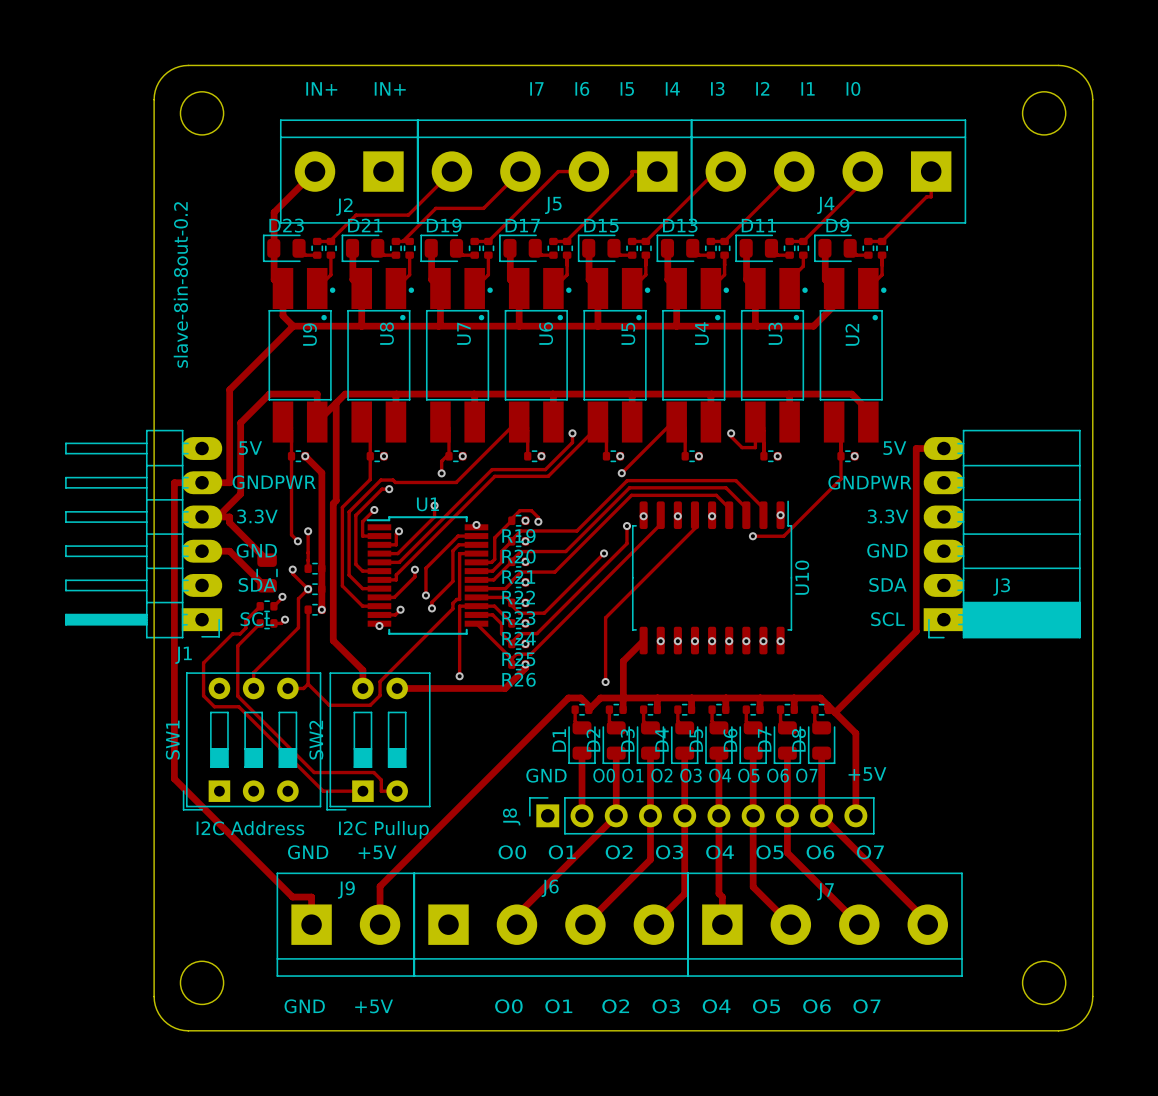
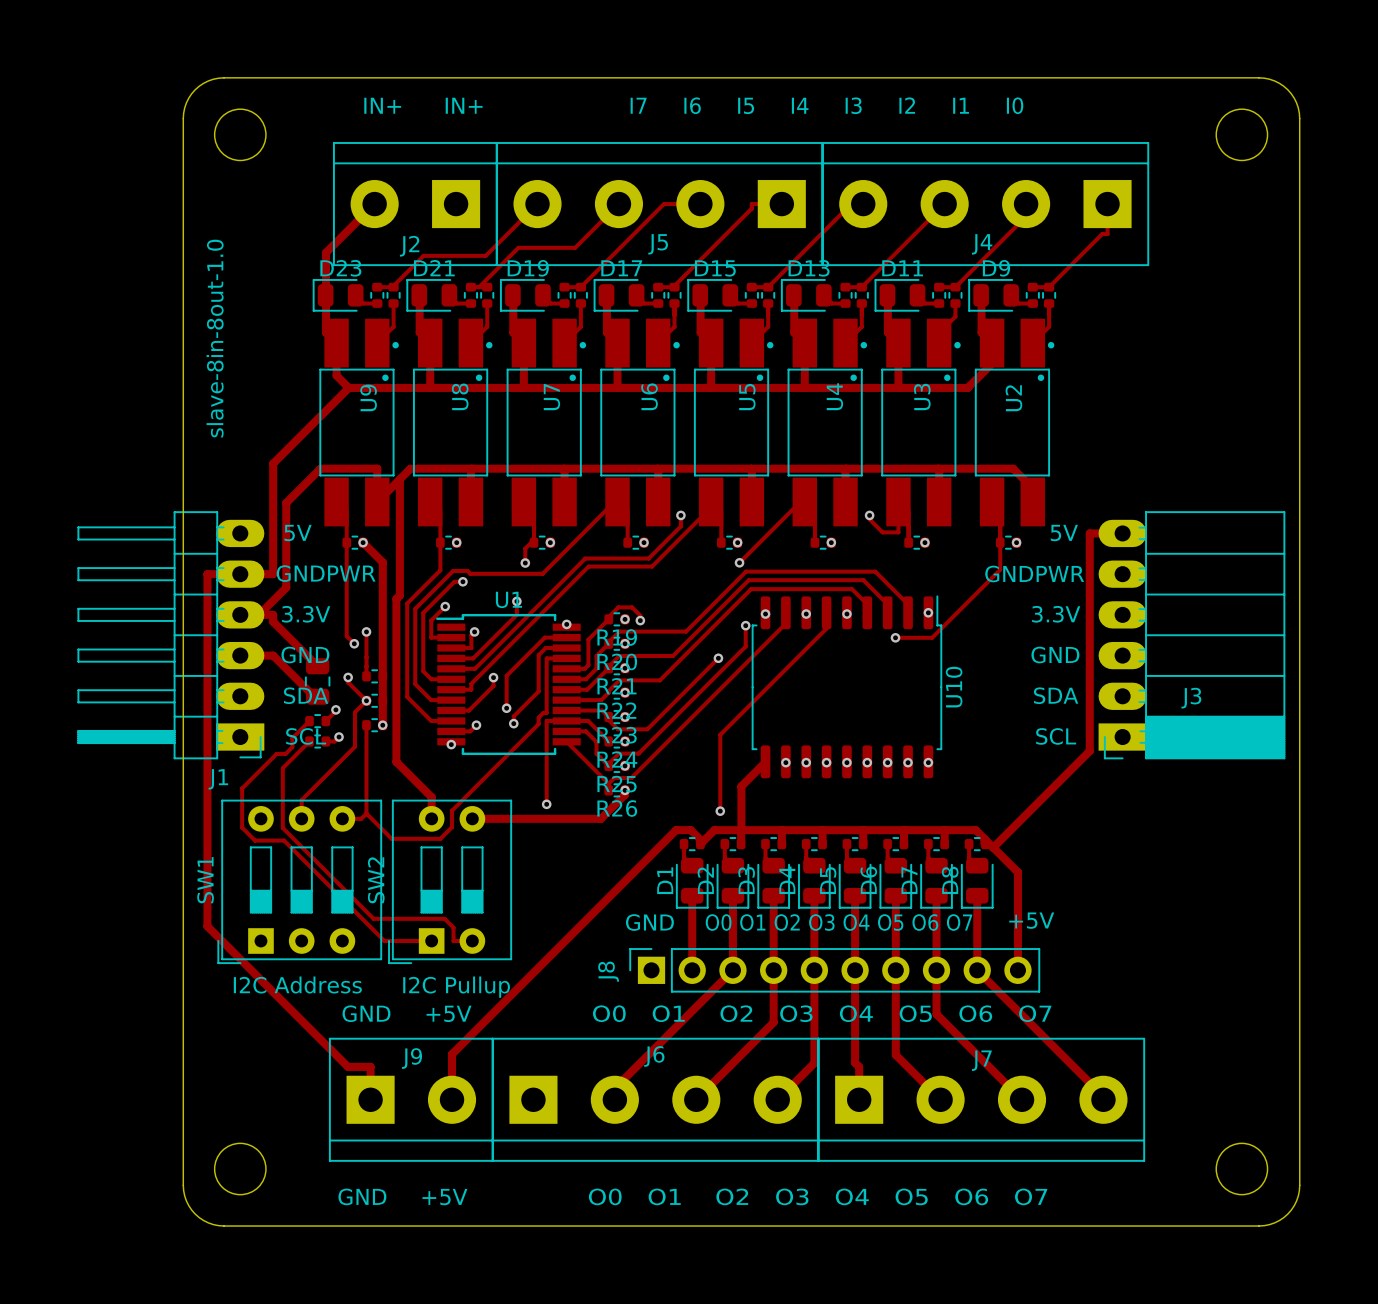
text: slave-8in-8out-0.2 (180, 284) -> slave-8in-8out-1.0 (215, 338)

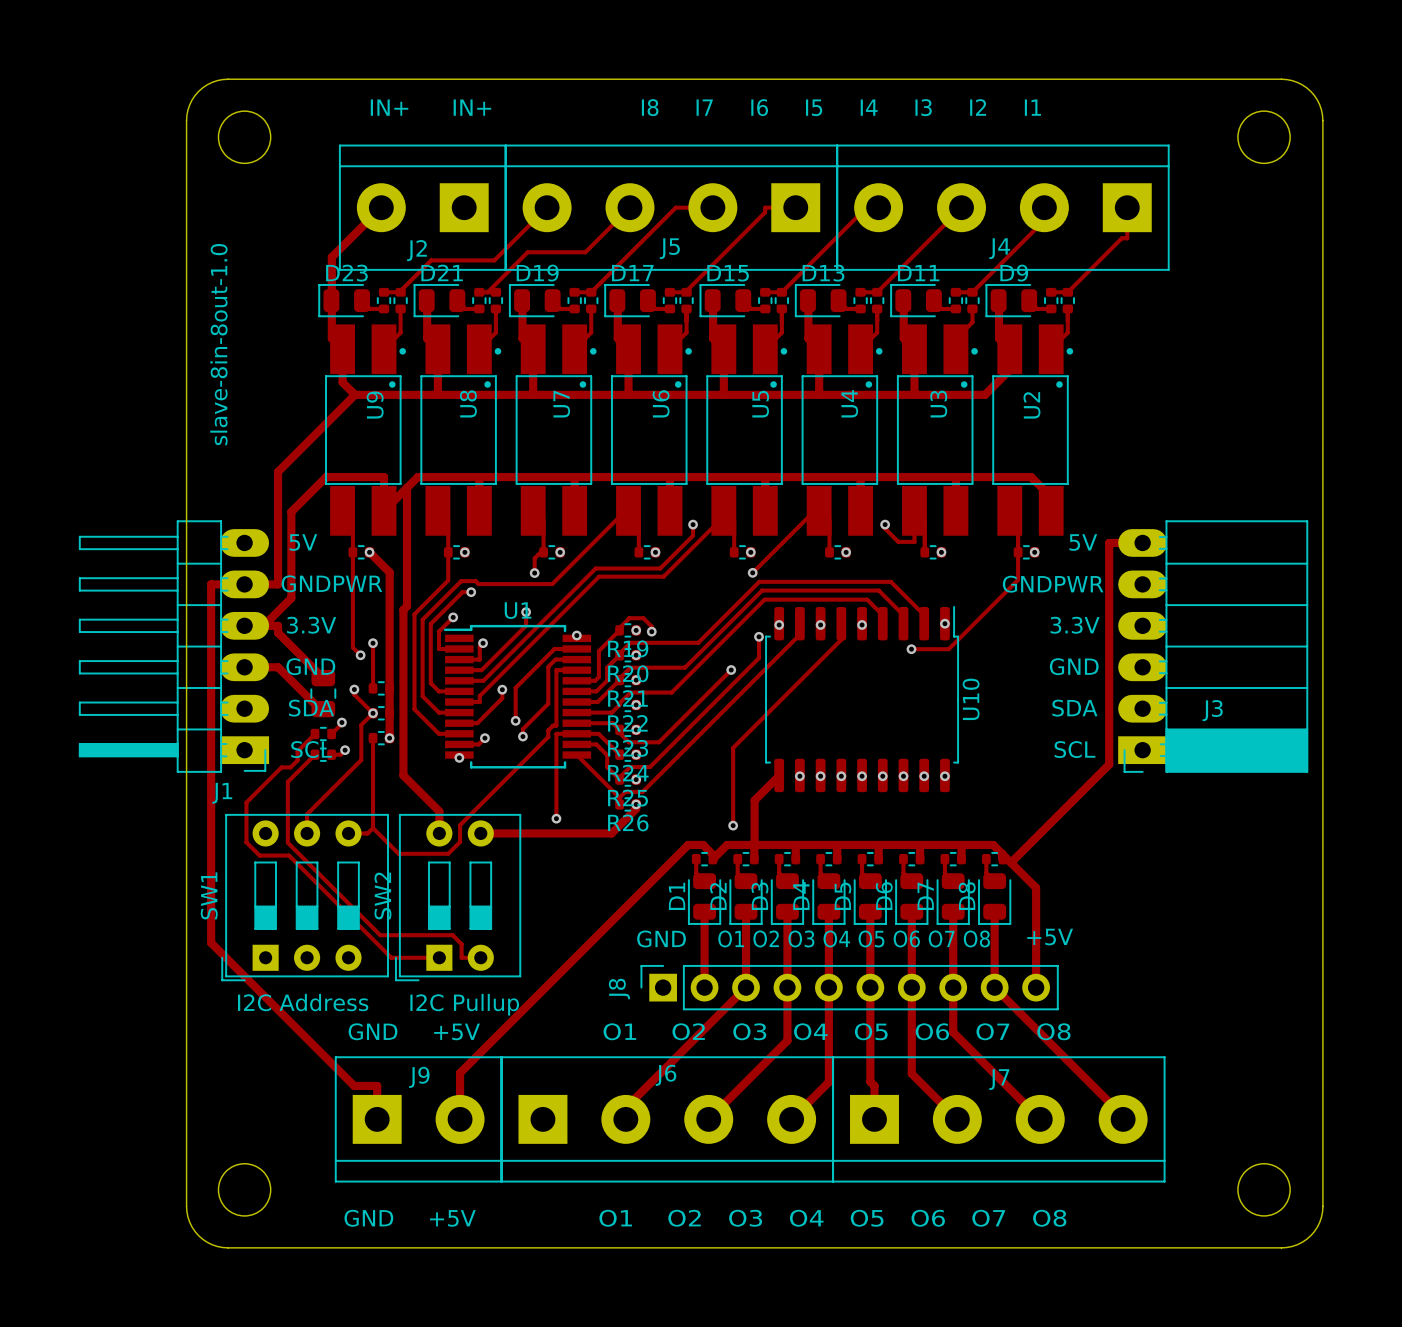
text: I7 I6 I5 I4 I3 I2 I1 I0 (826, 105) -> I8 I7 I6 I5 I4 I3 I2 I1 (841, 107)
text: O0 O1 O2 O3 O4 O5 O6 O7 (839, 922) -> O1 O2 O3 O4 O5 O6 O7 O8 (854, 938)
text: O0 O1 O2 O3 O4 O5 O6 O7 (822, 1013) -> O1 O2 O3 O4 O5 O6 O7 O8 (837, 1031)
text: O0 O1 O2 O3 O4 O5 O6 O7 (818, 1196) -> O1 O2 O3 O4 O5 O6 O7 O8 (832, 1218)

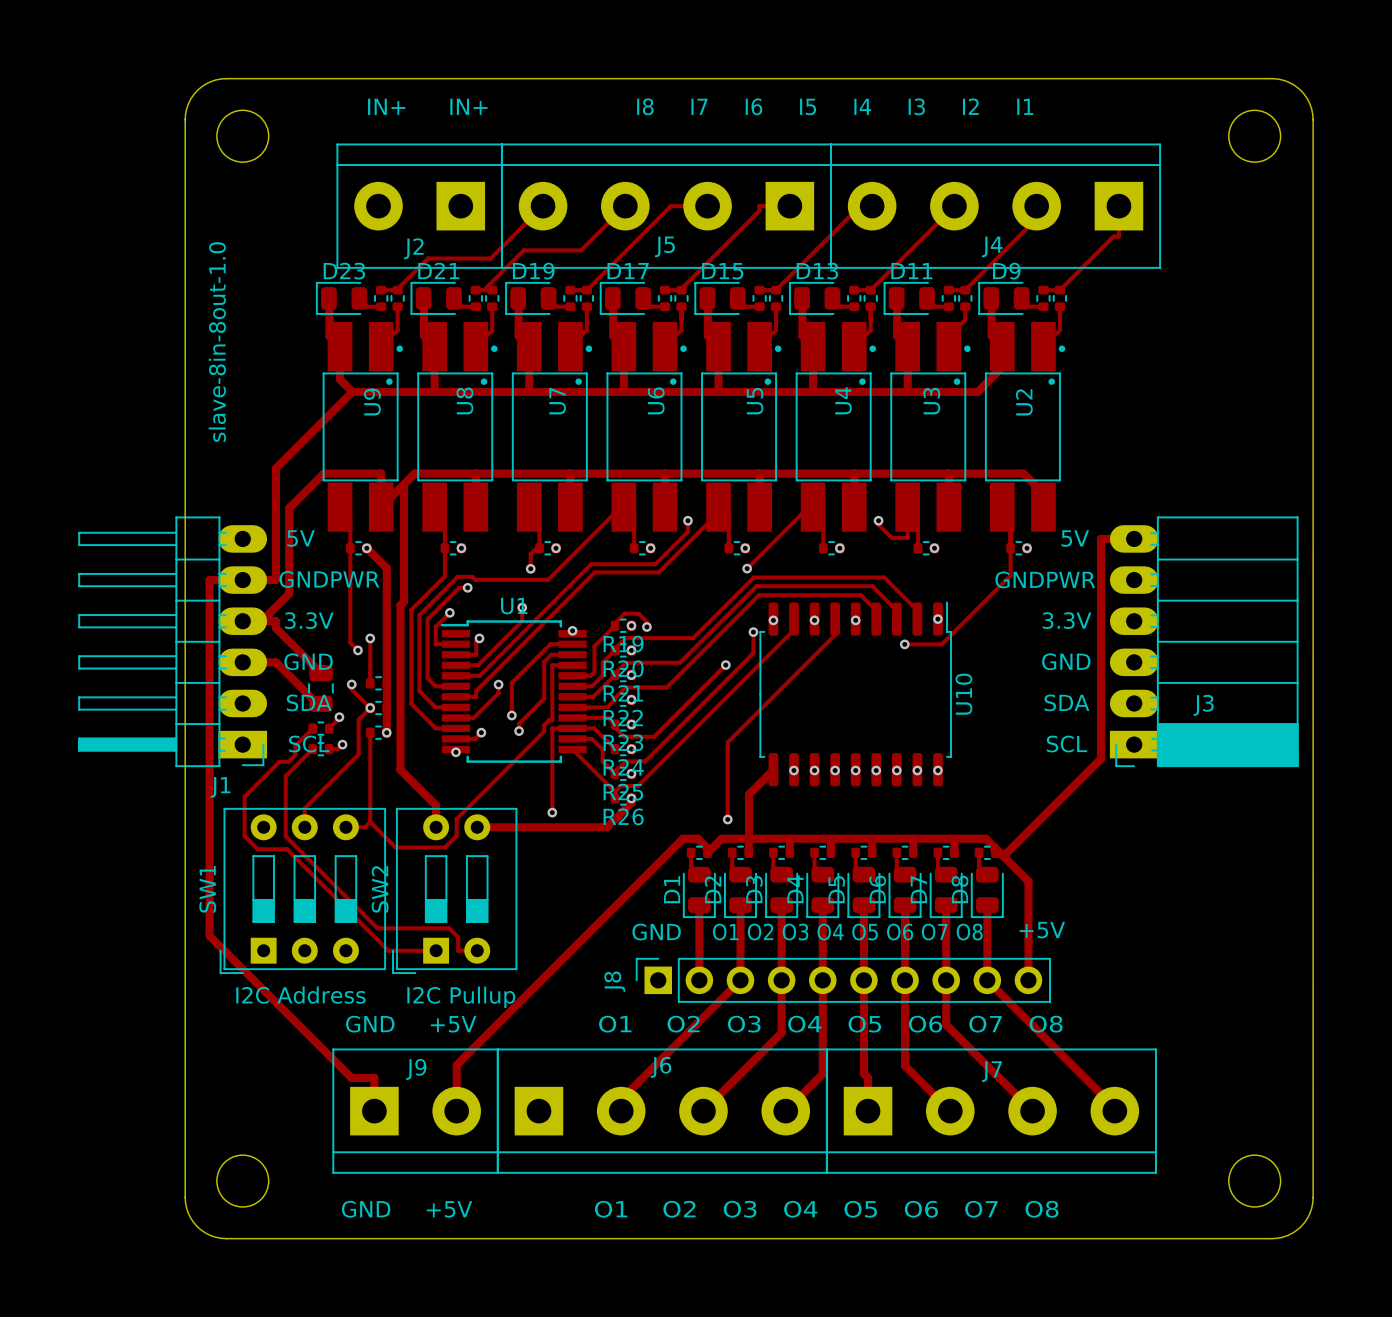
track: (381, 207) (331, 257) (331, 300) -> none

